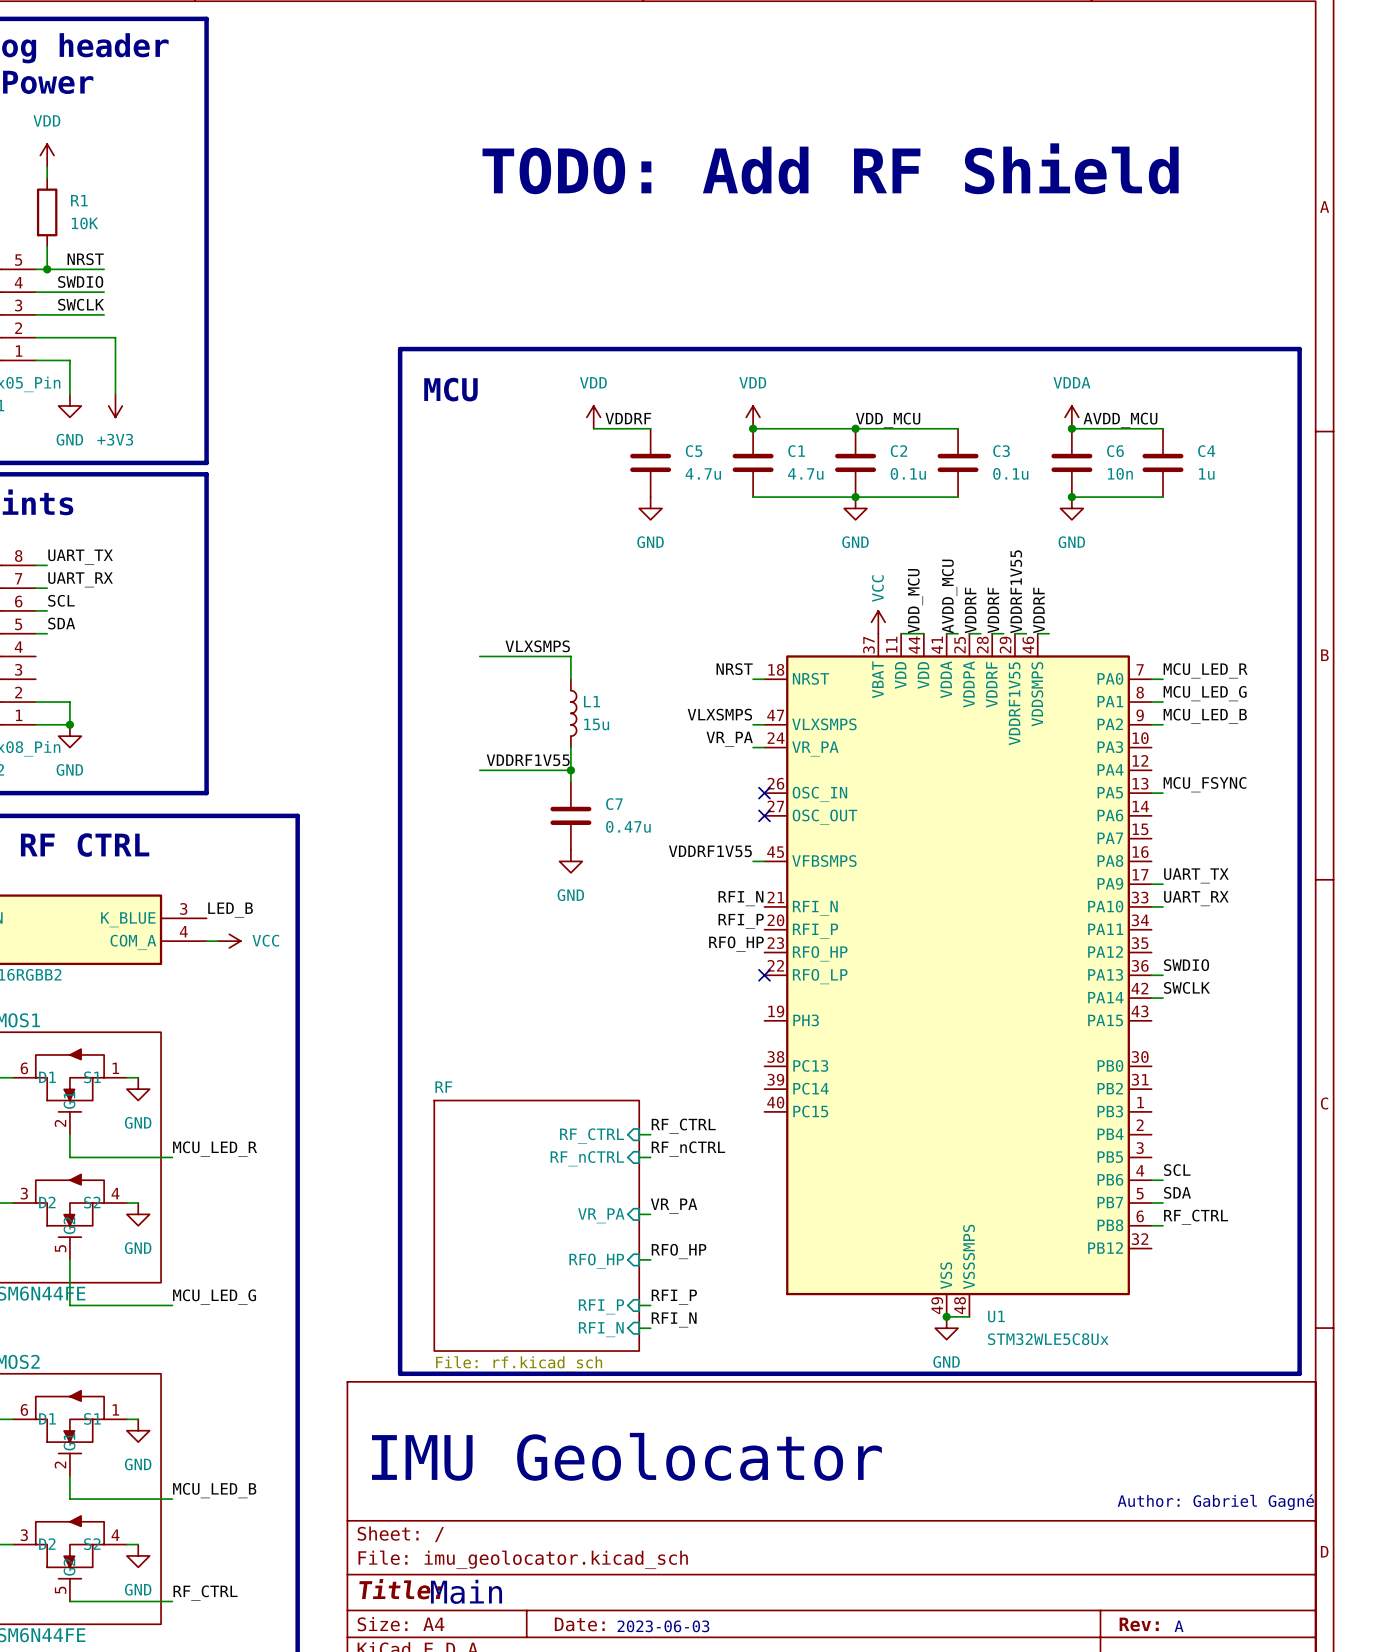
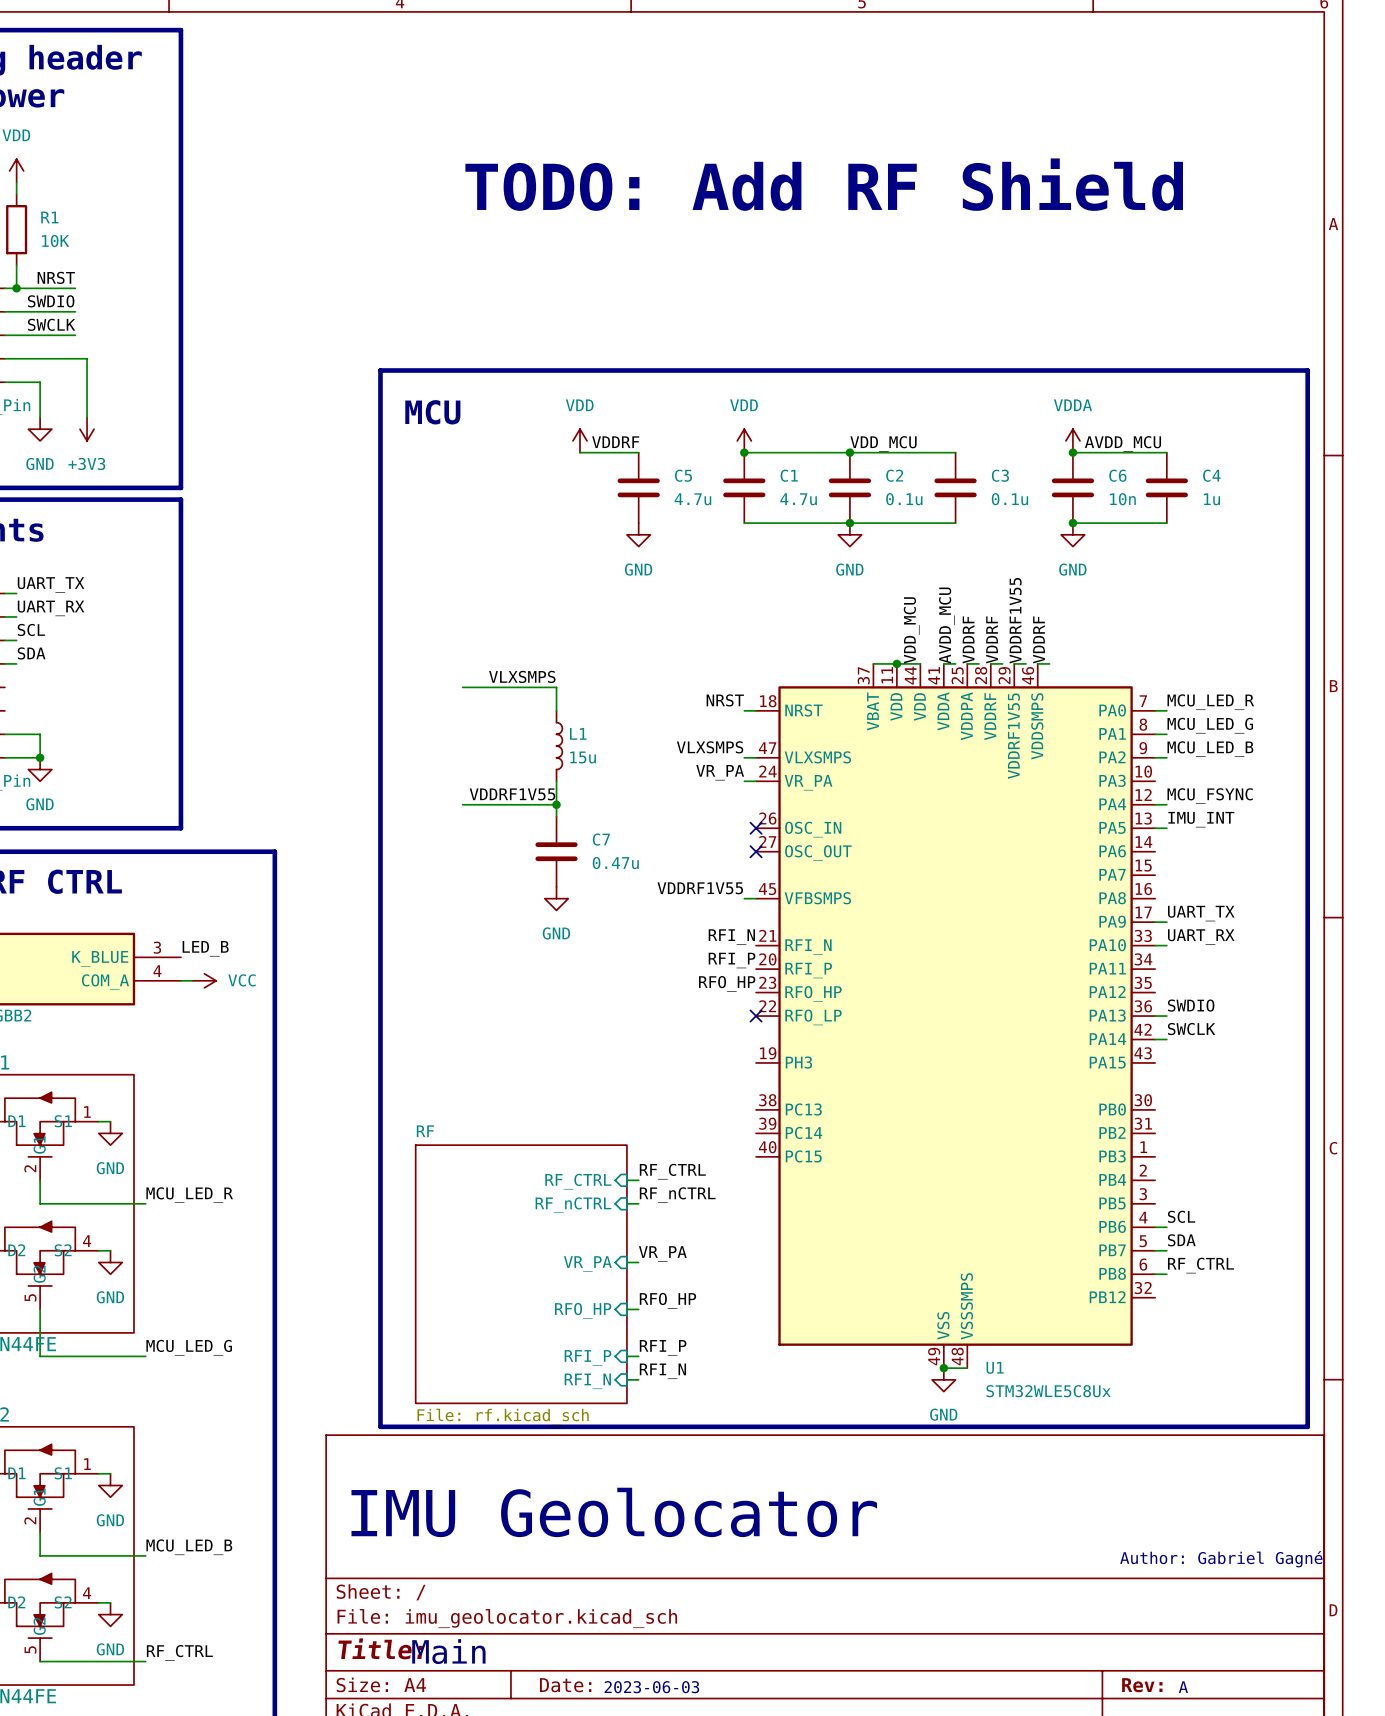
power symbol: VCC (878, 622) -> none
wire: none -> (873, 663) (896, 663)
junction: none -> (896, 663)
label: none -> MCU_FSYNC (1210, 796)
wire: none -> (1155, 804) (1166, 804)
label: MCU_FSYNC (1205, 784) -> IMU_INT (1201, 819)

